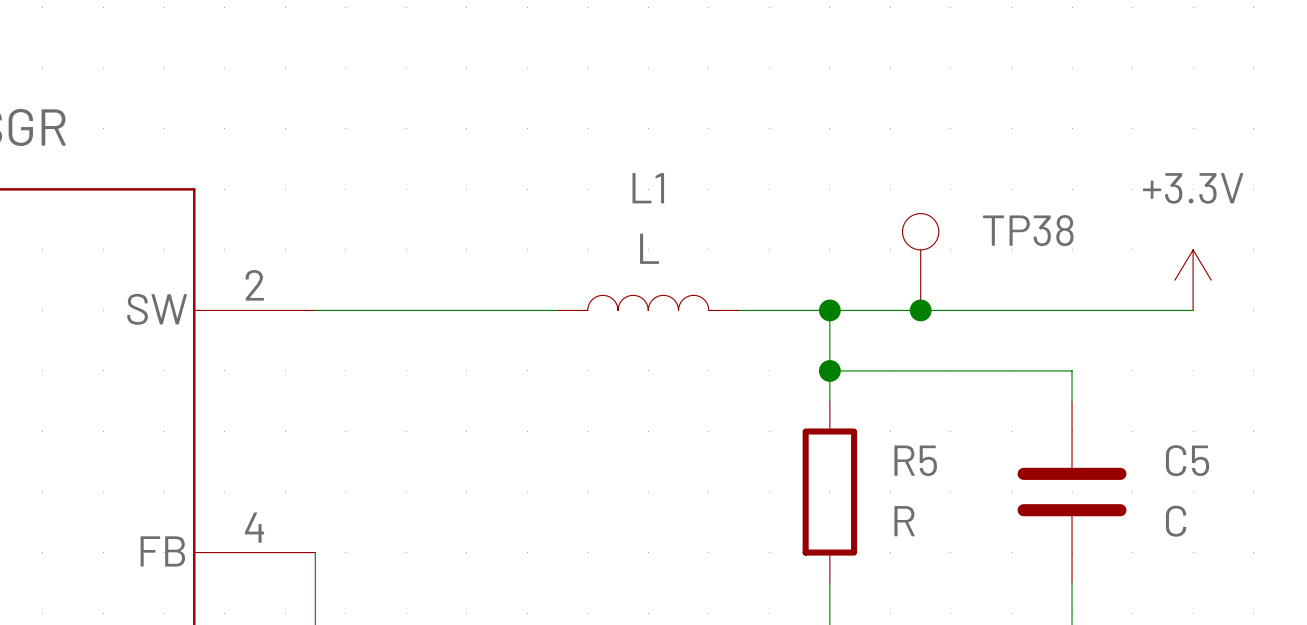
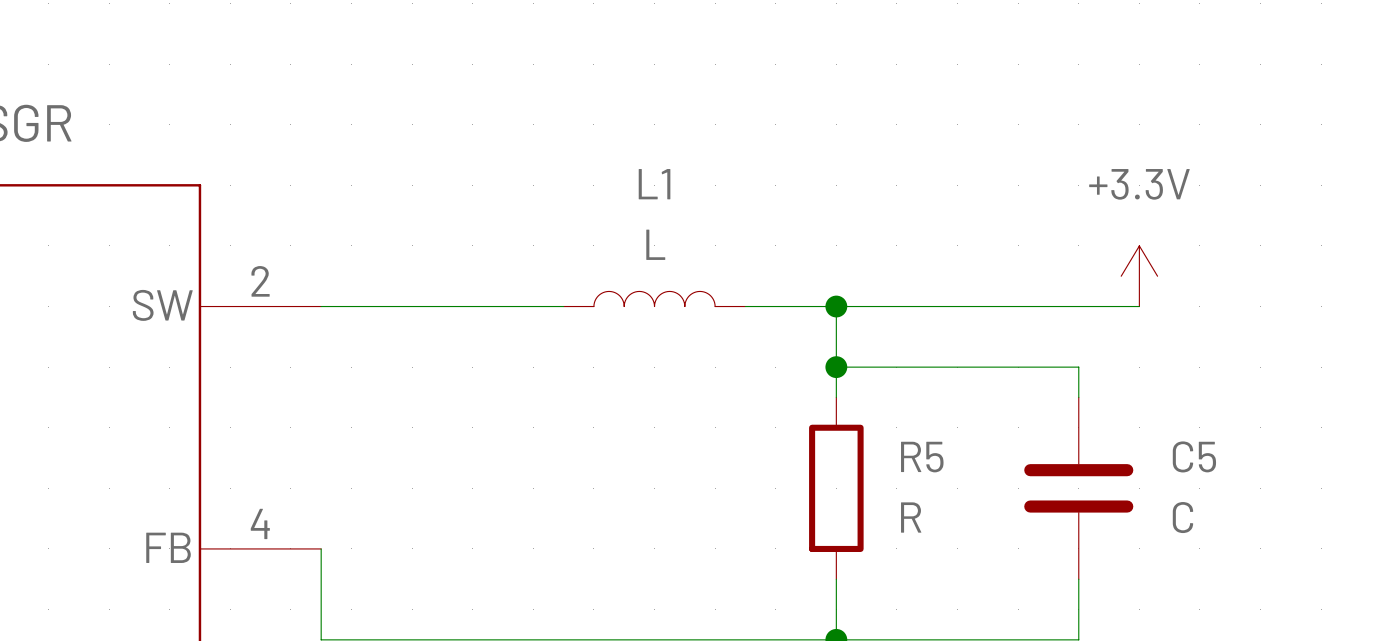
TP38: (920, 262) -> none
power symbol position: +3.3V (1193, 280) -> +3.3V (1139, 276)
junction: (920, 310) -> none
wire: (1132, 310) (1193, 310) -> none

